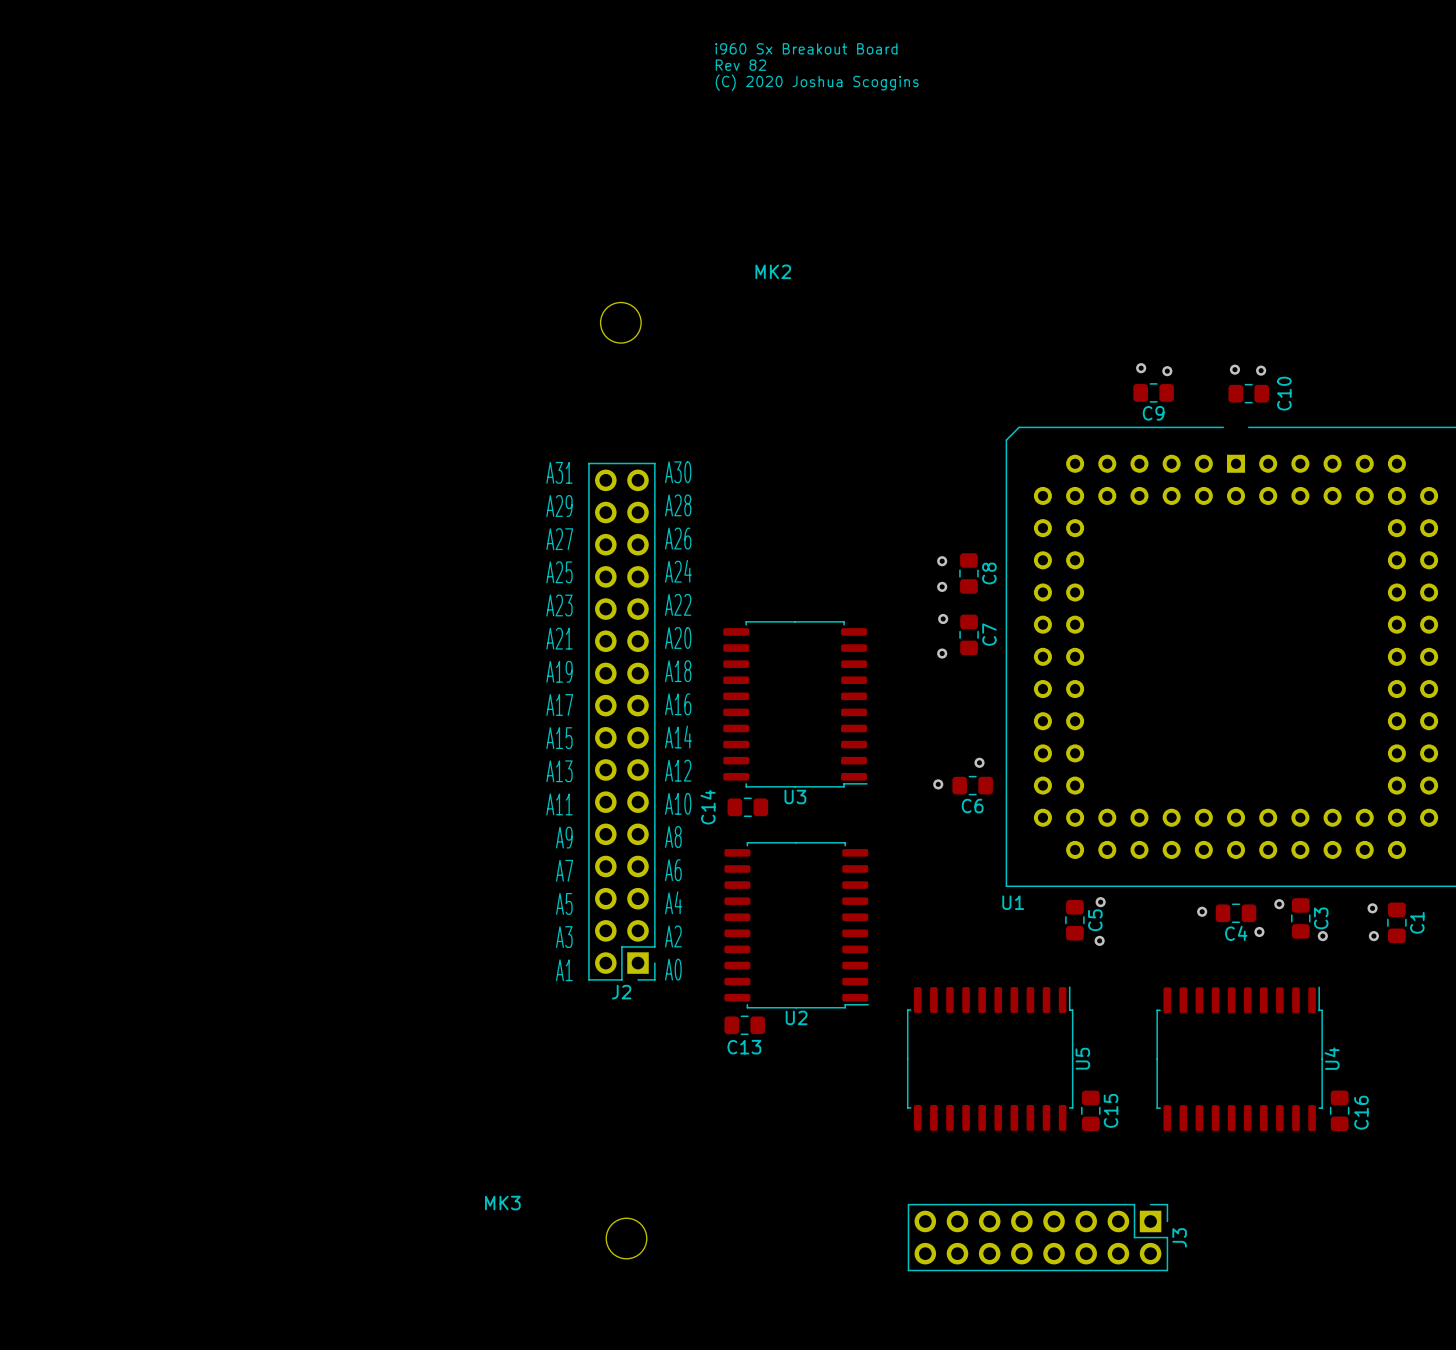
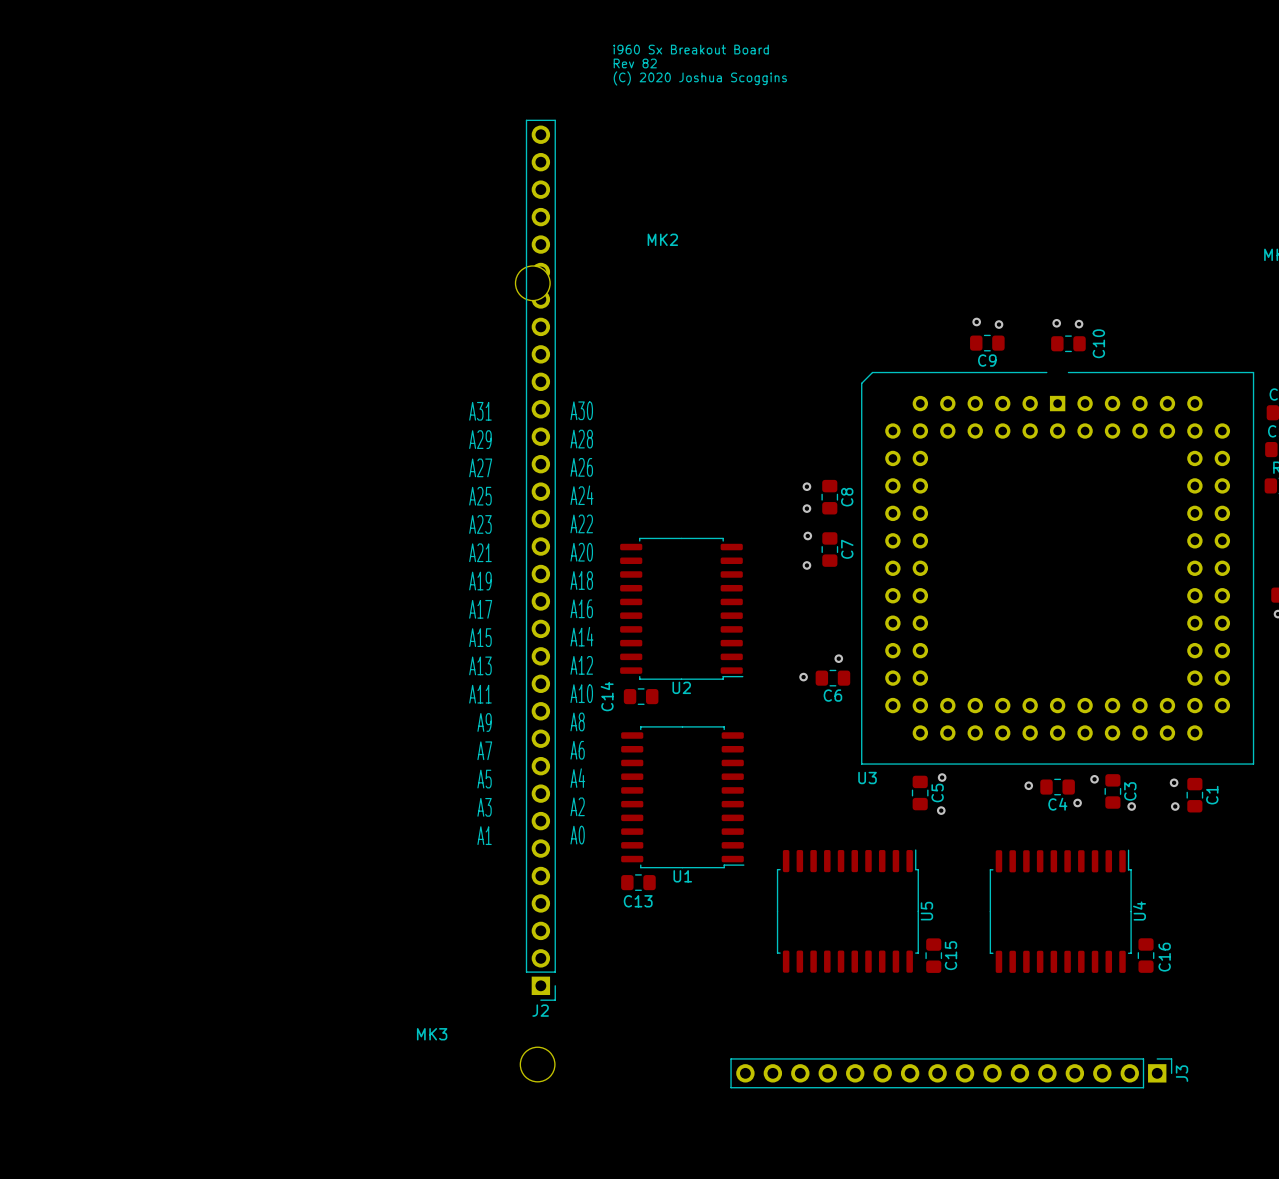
J2 footprint: [588, 462, 656, 981] -> [525, 119, 556, 1001]
U3 name: U3 (795, 797) -> U2 (681, 687)
U1 name: U1 (1013, 902) -> U3 (867, 778)
J2 name position: J2 (621, 992) -> J2 (540, 1010)
U2 name: U2 (796, 1017) -> U1 (682, 876)
J3 footprint: [907, 1203, 1169, 1272] -> [730, 1058, 1173, 1089]
J3 name position: J3 (1179, 1237) -> J3 (1182, 1073)

